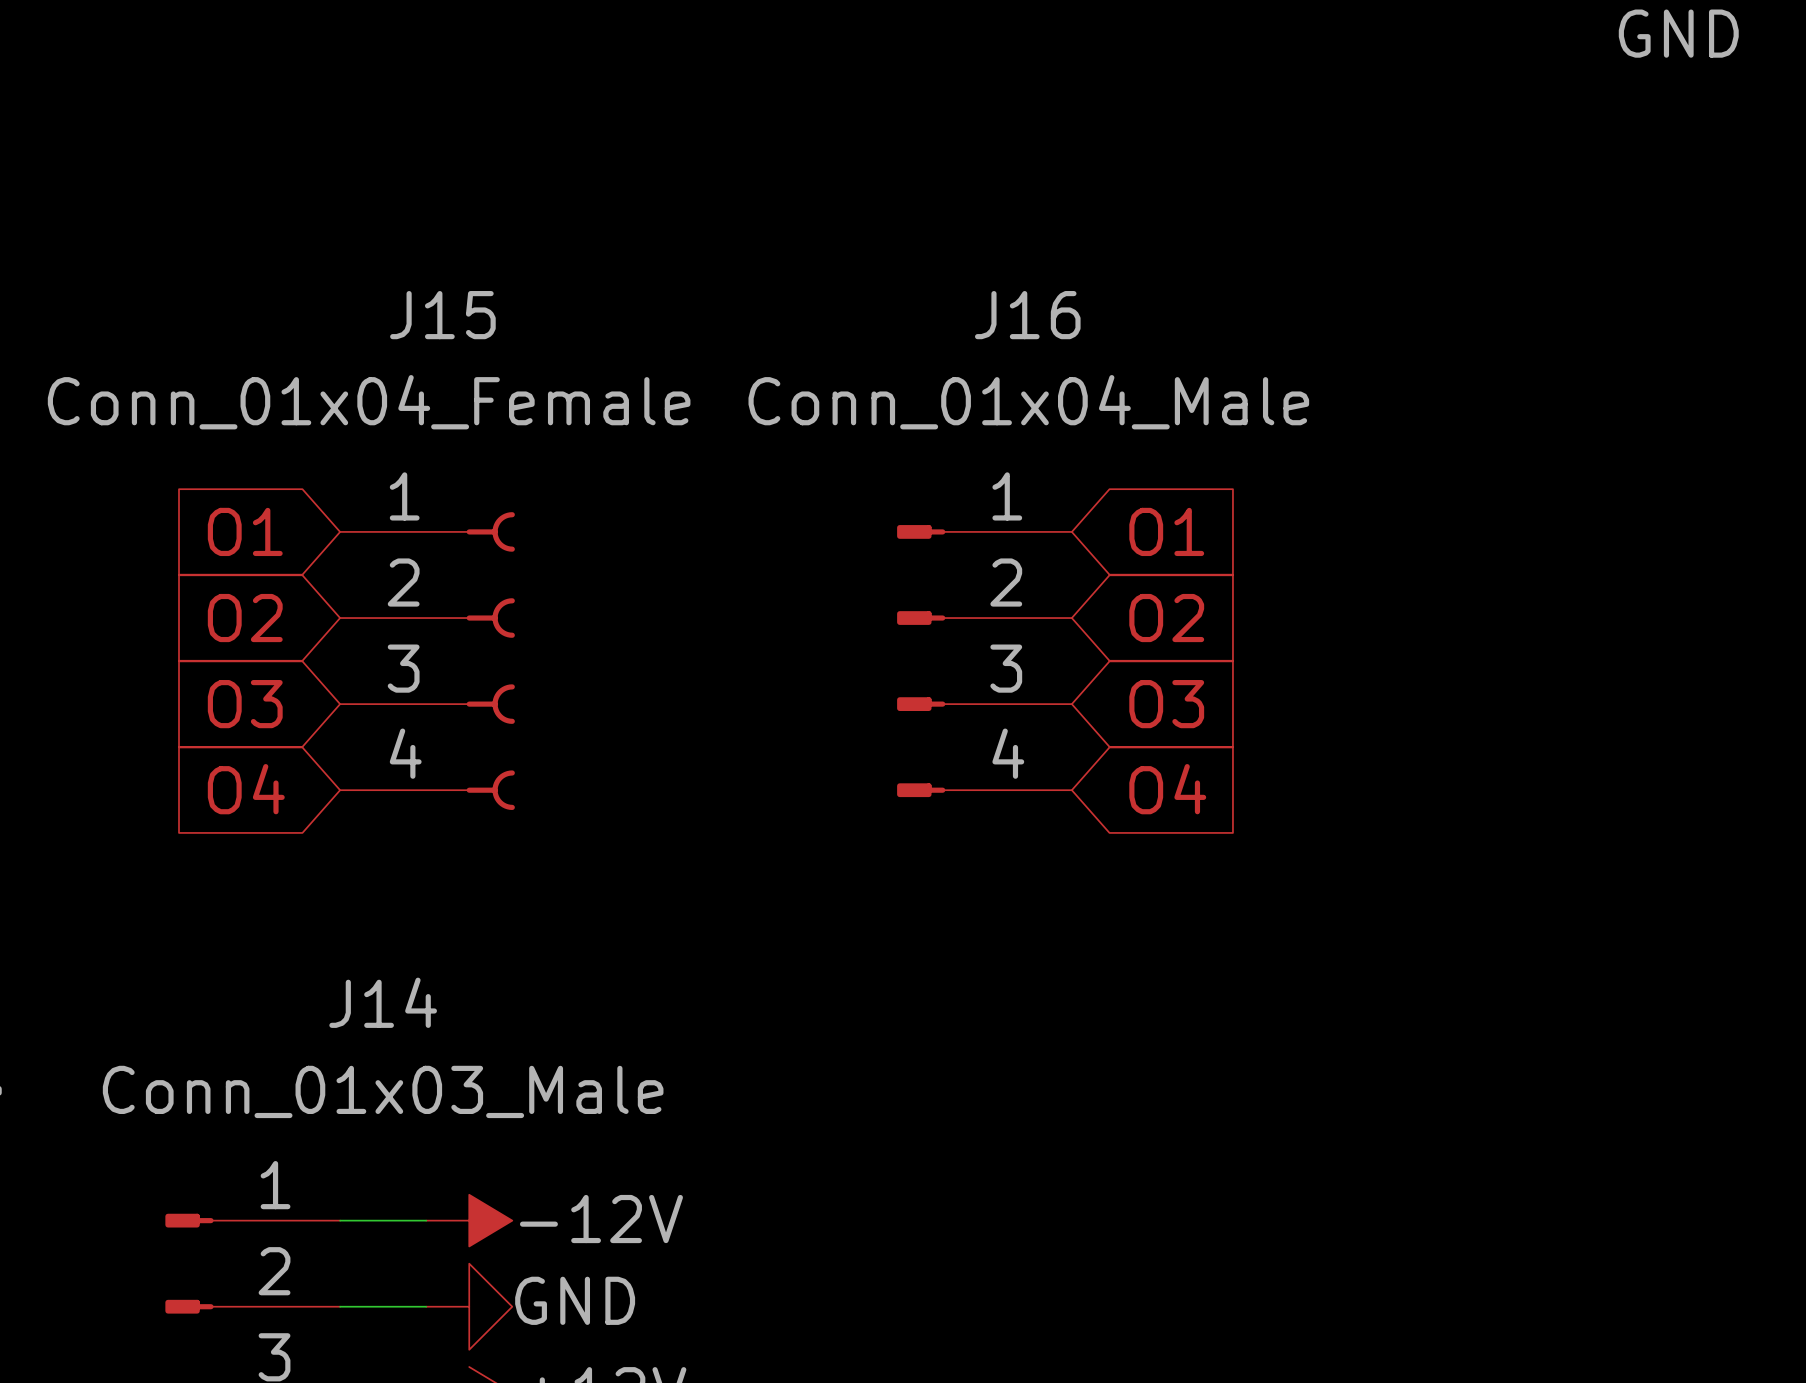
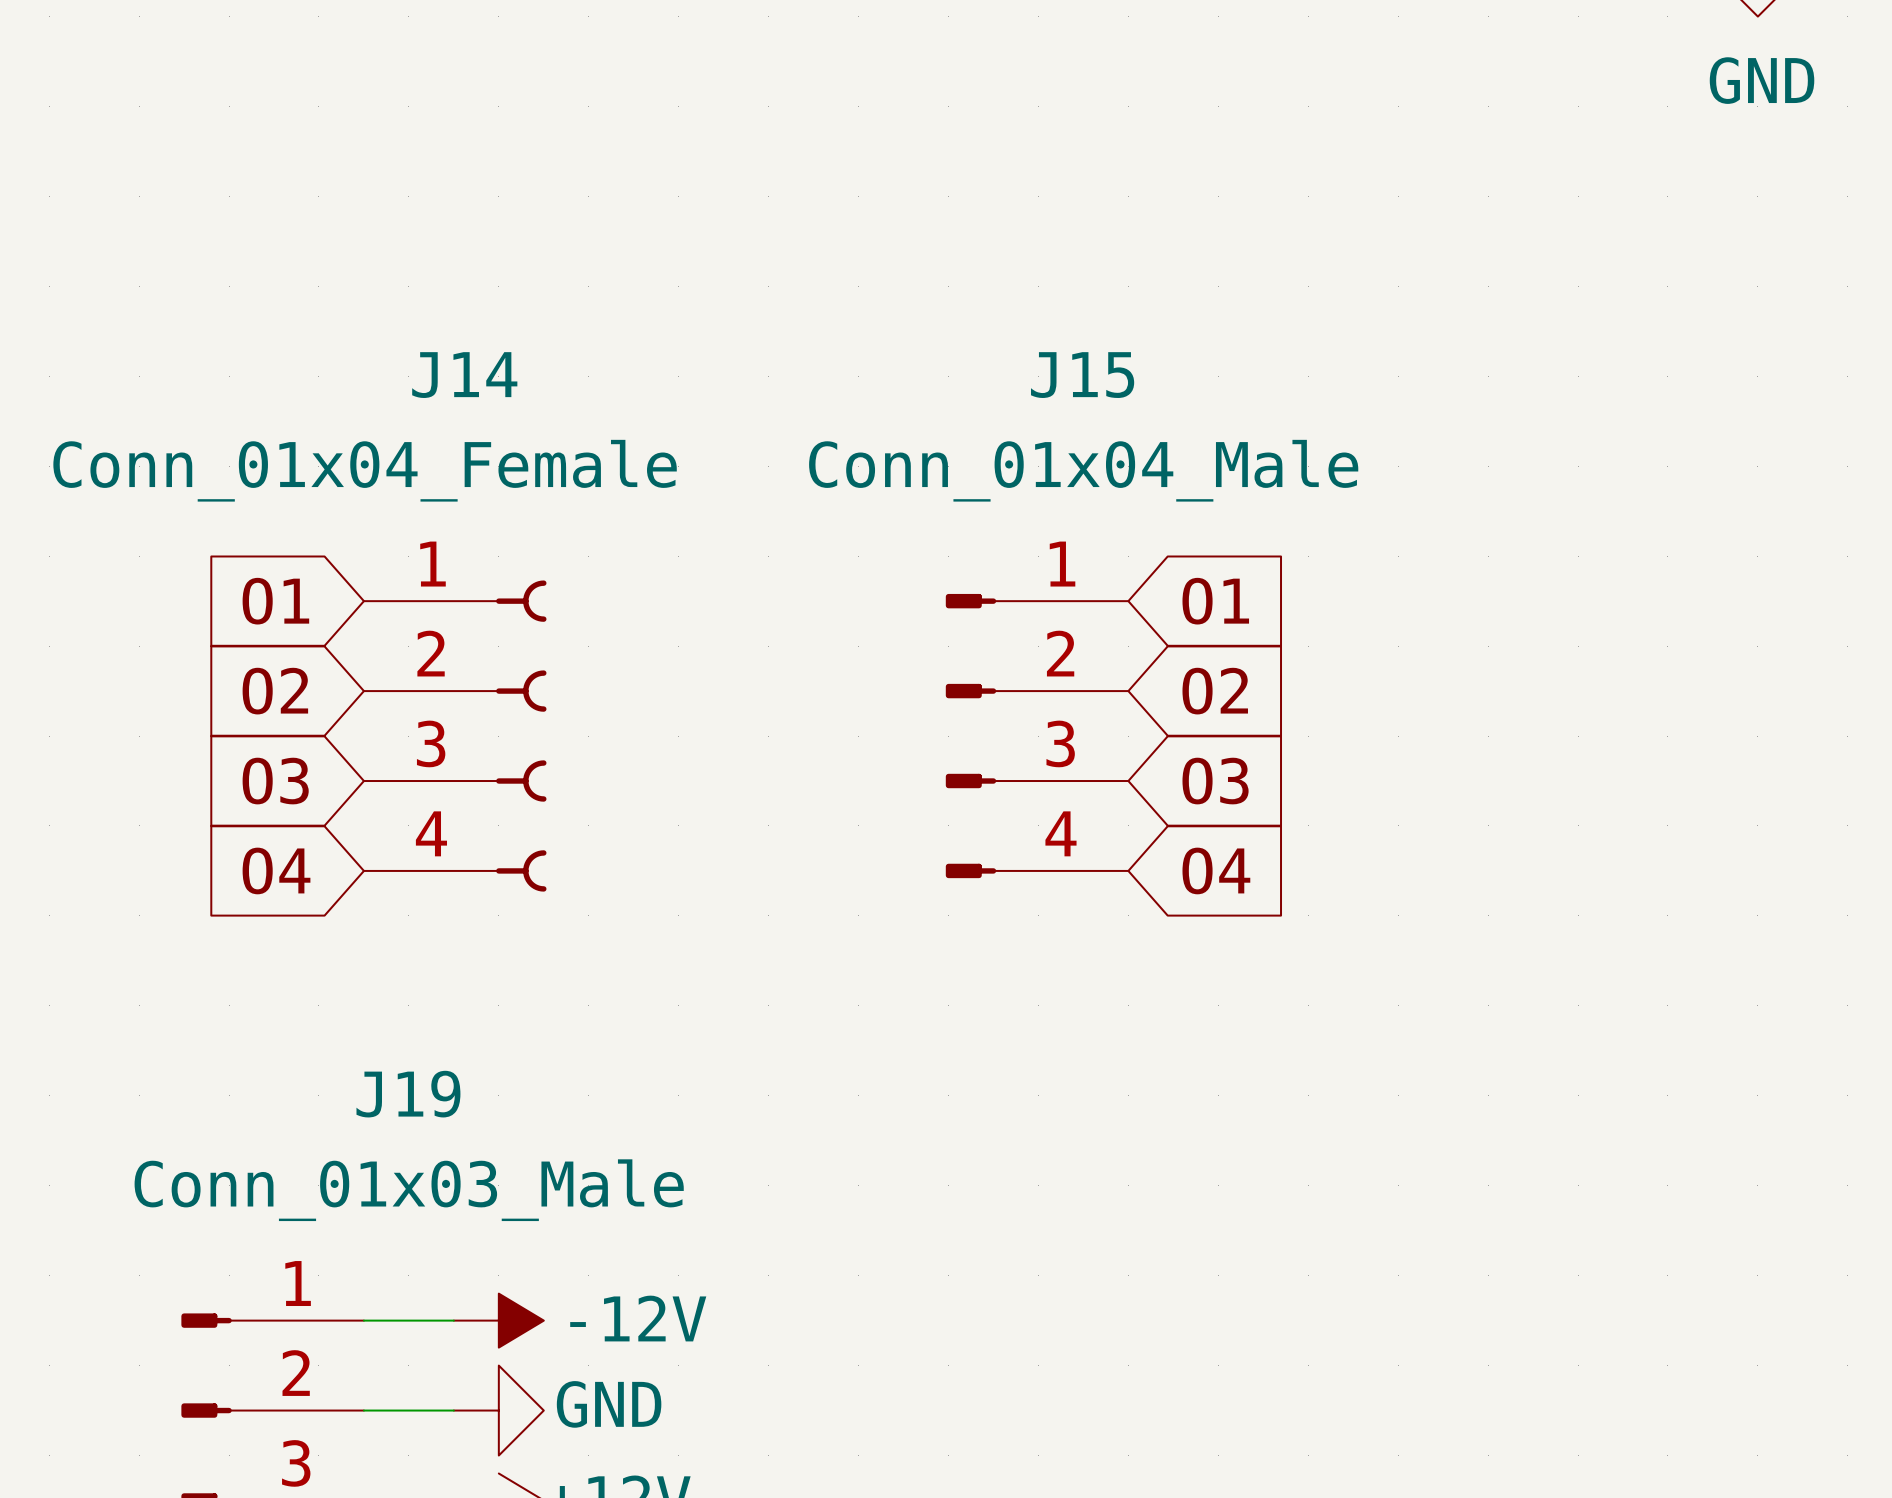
J15 name: J15 (442, 315) -> J14 (464, 375)
J16 name: J16 (1027, 315) -> J15 (1082, 375)
J14 name: J14 (383, 1002) -> J19 (408, 1094)

